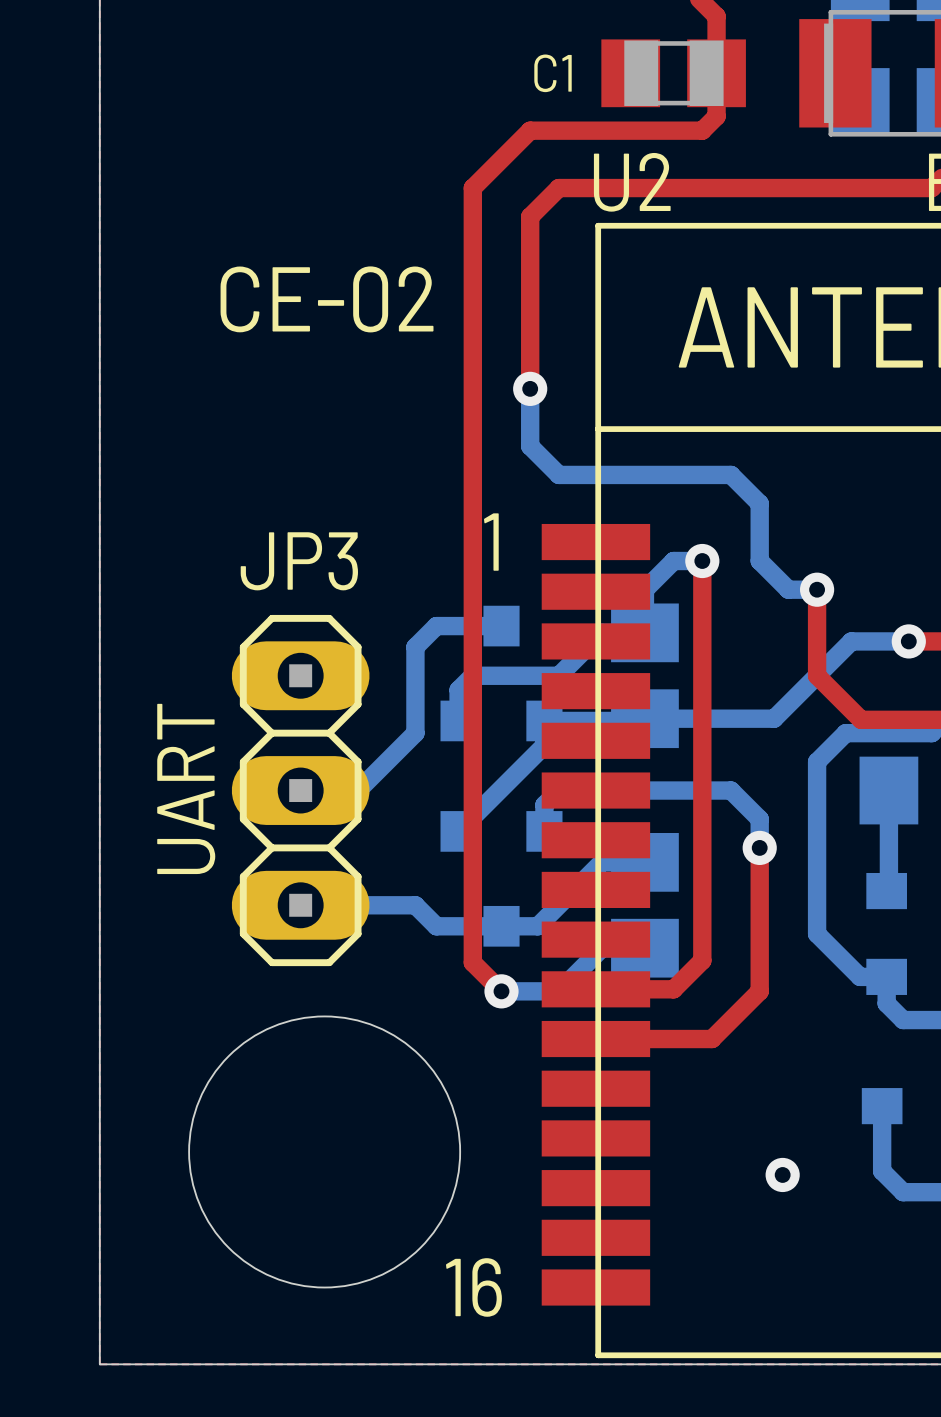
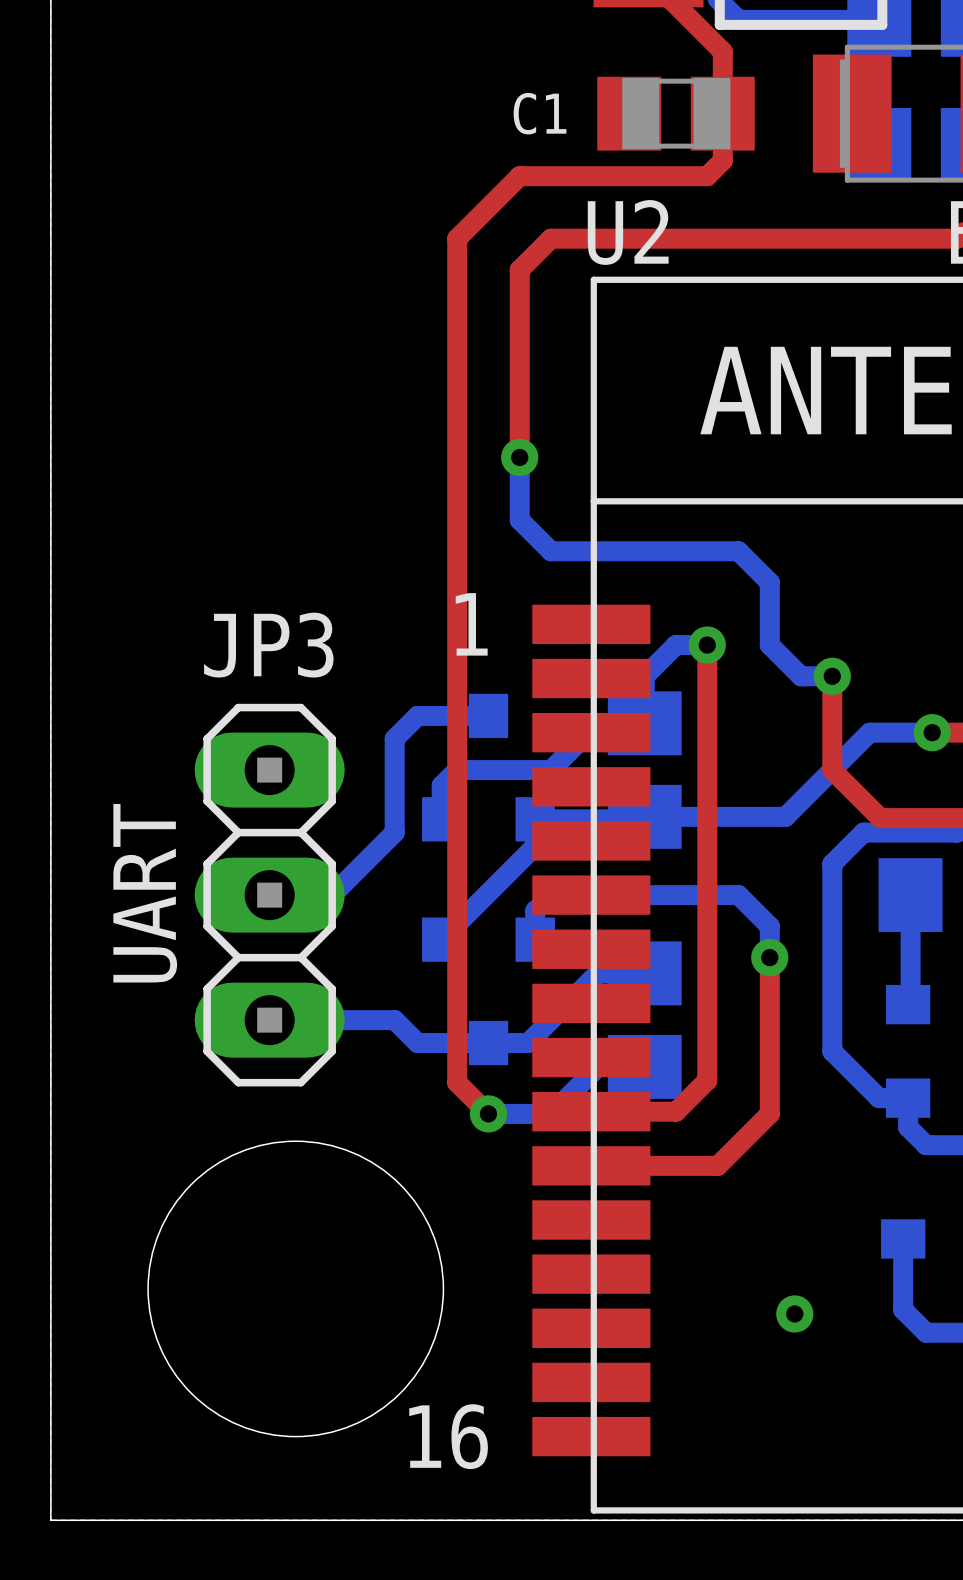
text: CE-02 (327, 299) -> none

